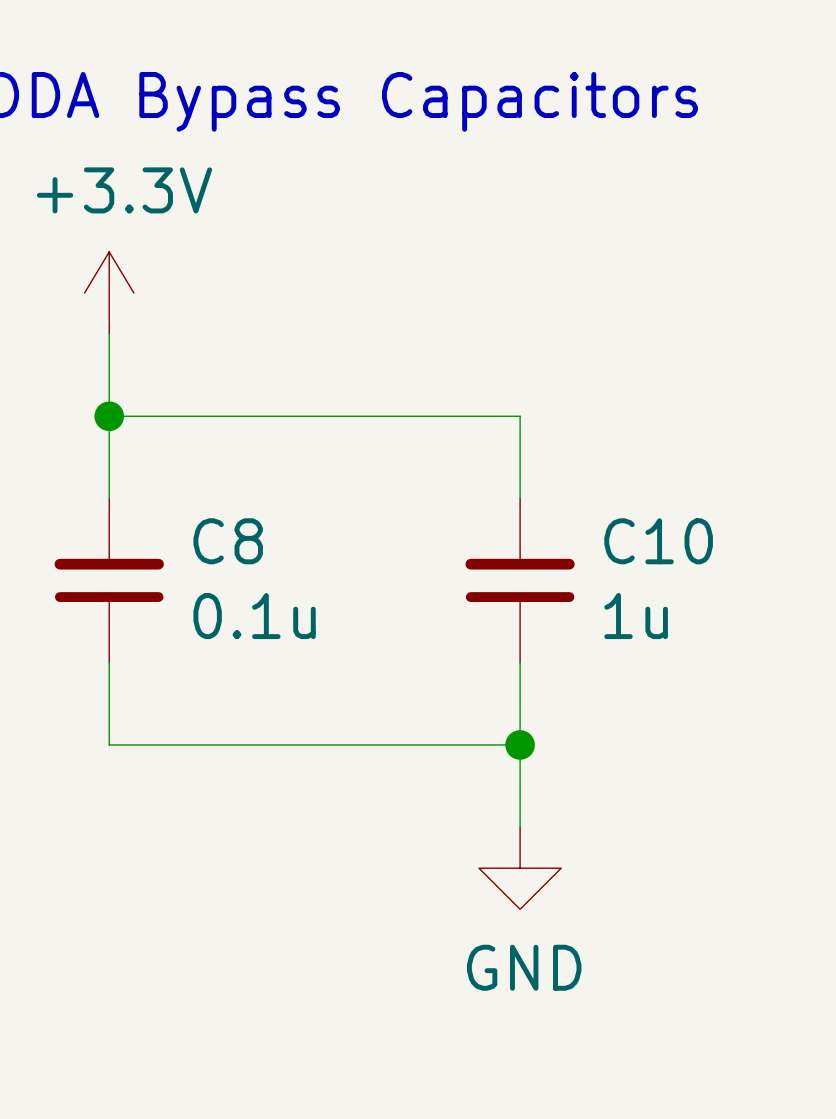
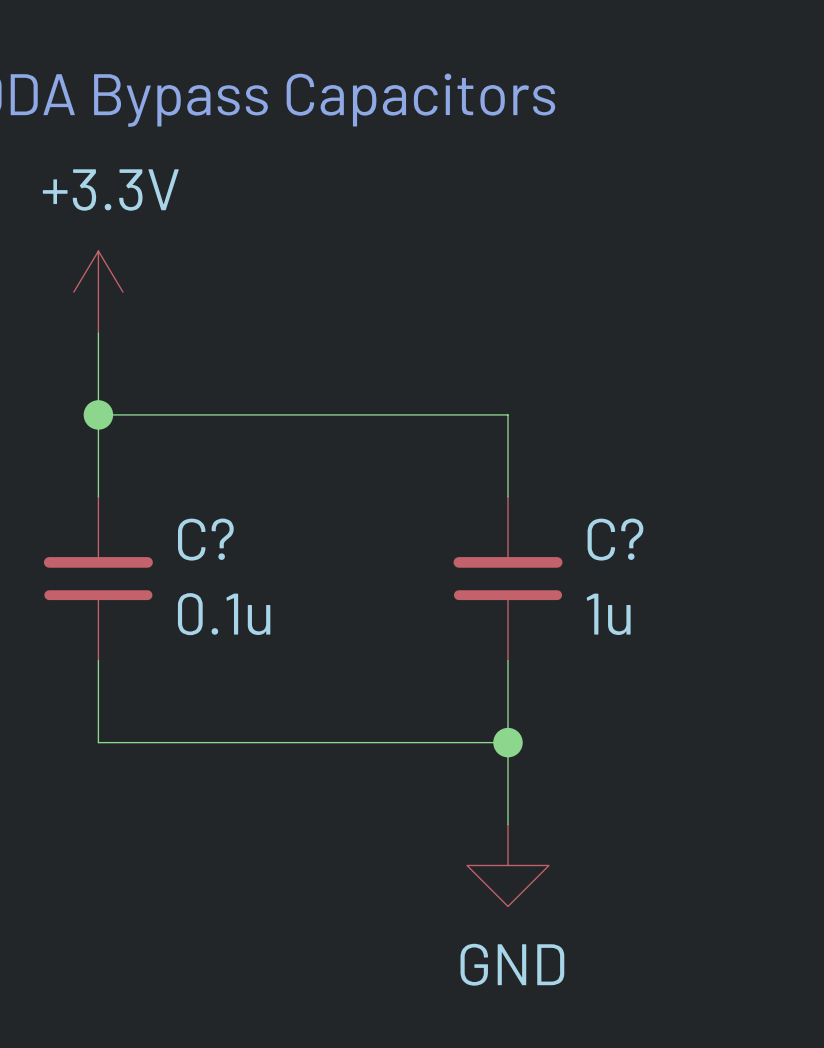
C8 name: C8 (228, 541) -> C? (205, 539)
C10 name: C10 (658, 541) -> C? (615, 539)

